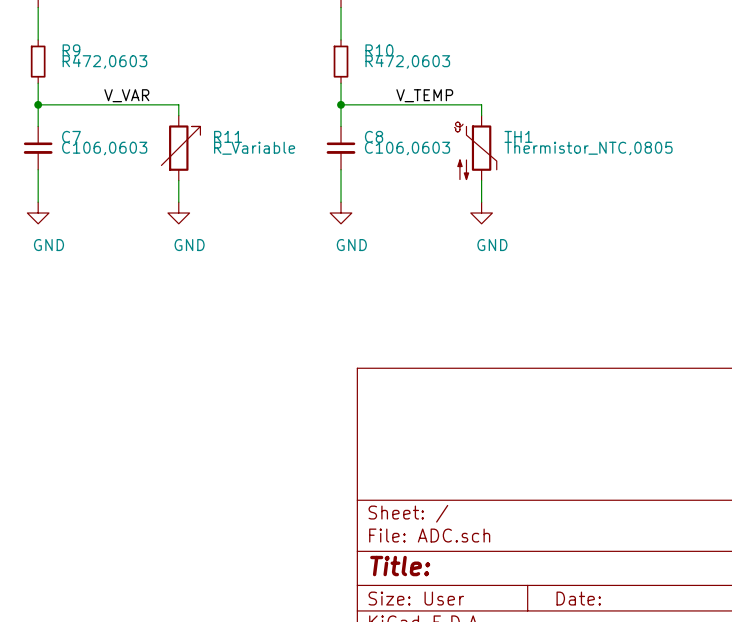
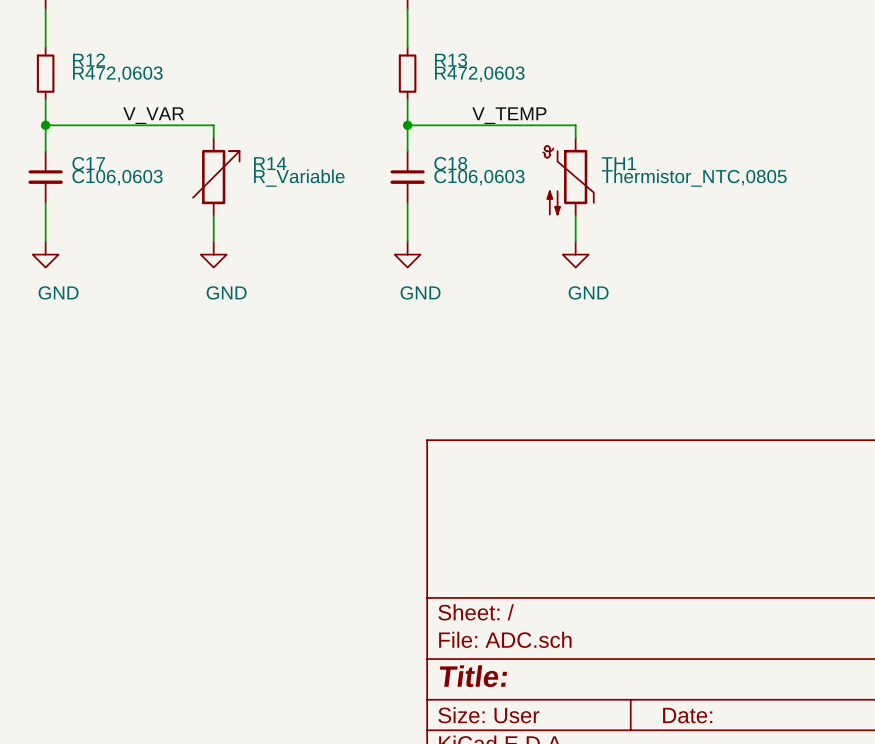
R9 name: R9 (71, 50) -> R12 (89, 60)
R10 name: R10 (379, 50) -> R13 (451, 60)
C7 name: C7 (71, 136) -> C17 (88, 163)
R11 name: R11 (228, 136) -> R14 (270, 163)
C8 name: C8 (374, 136) -> C18 (450, 163)

